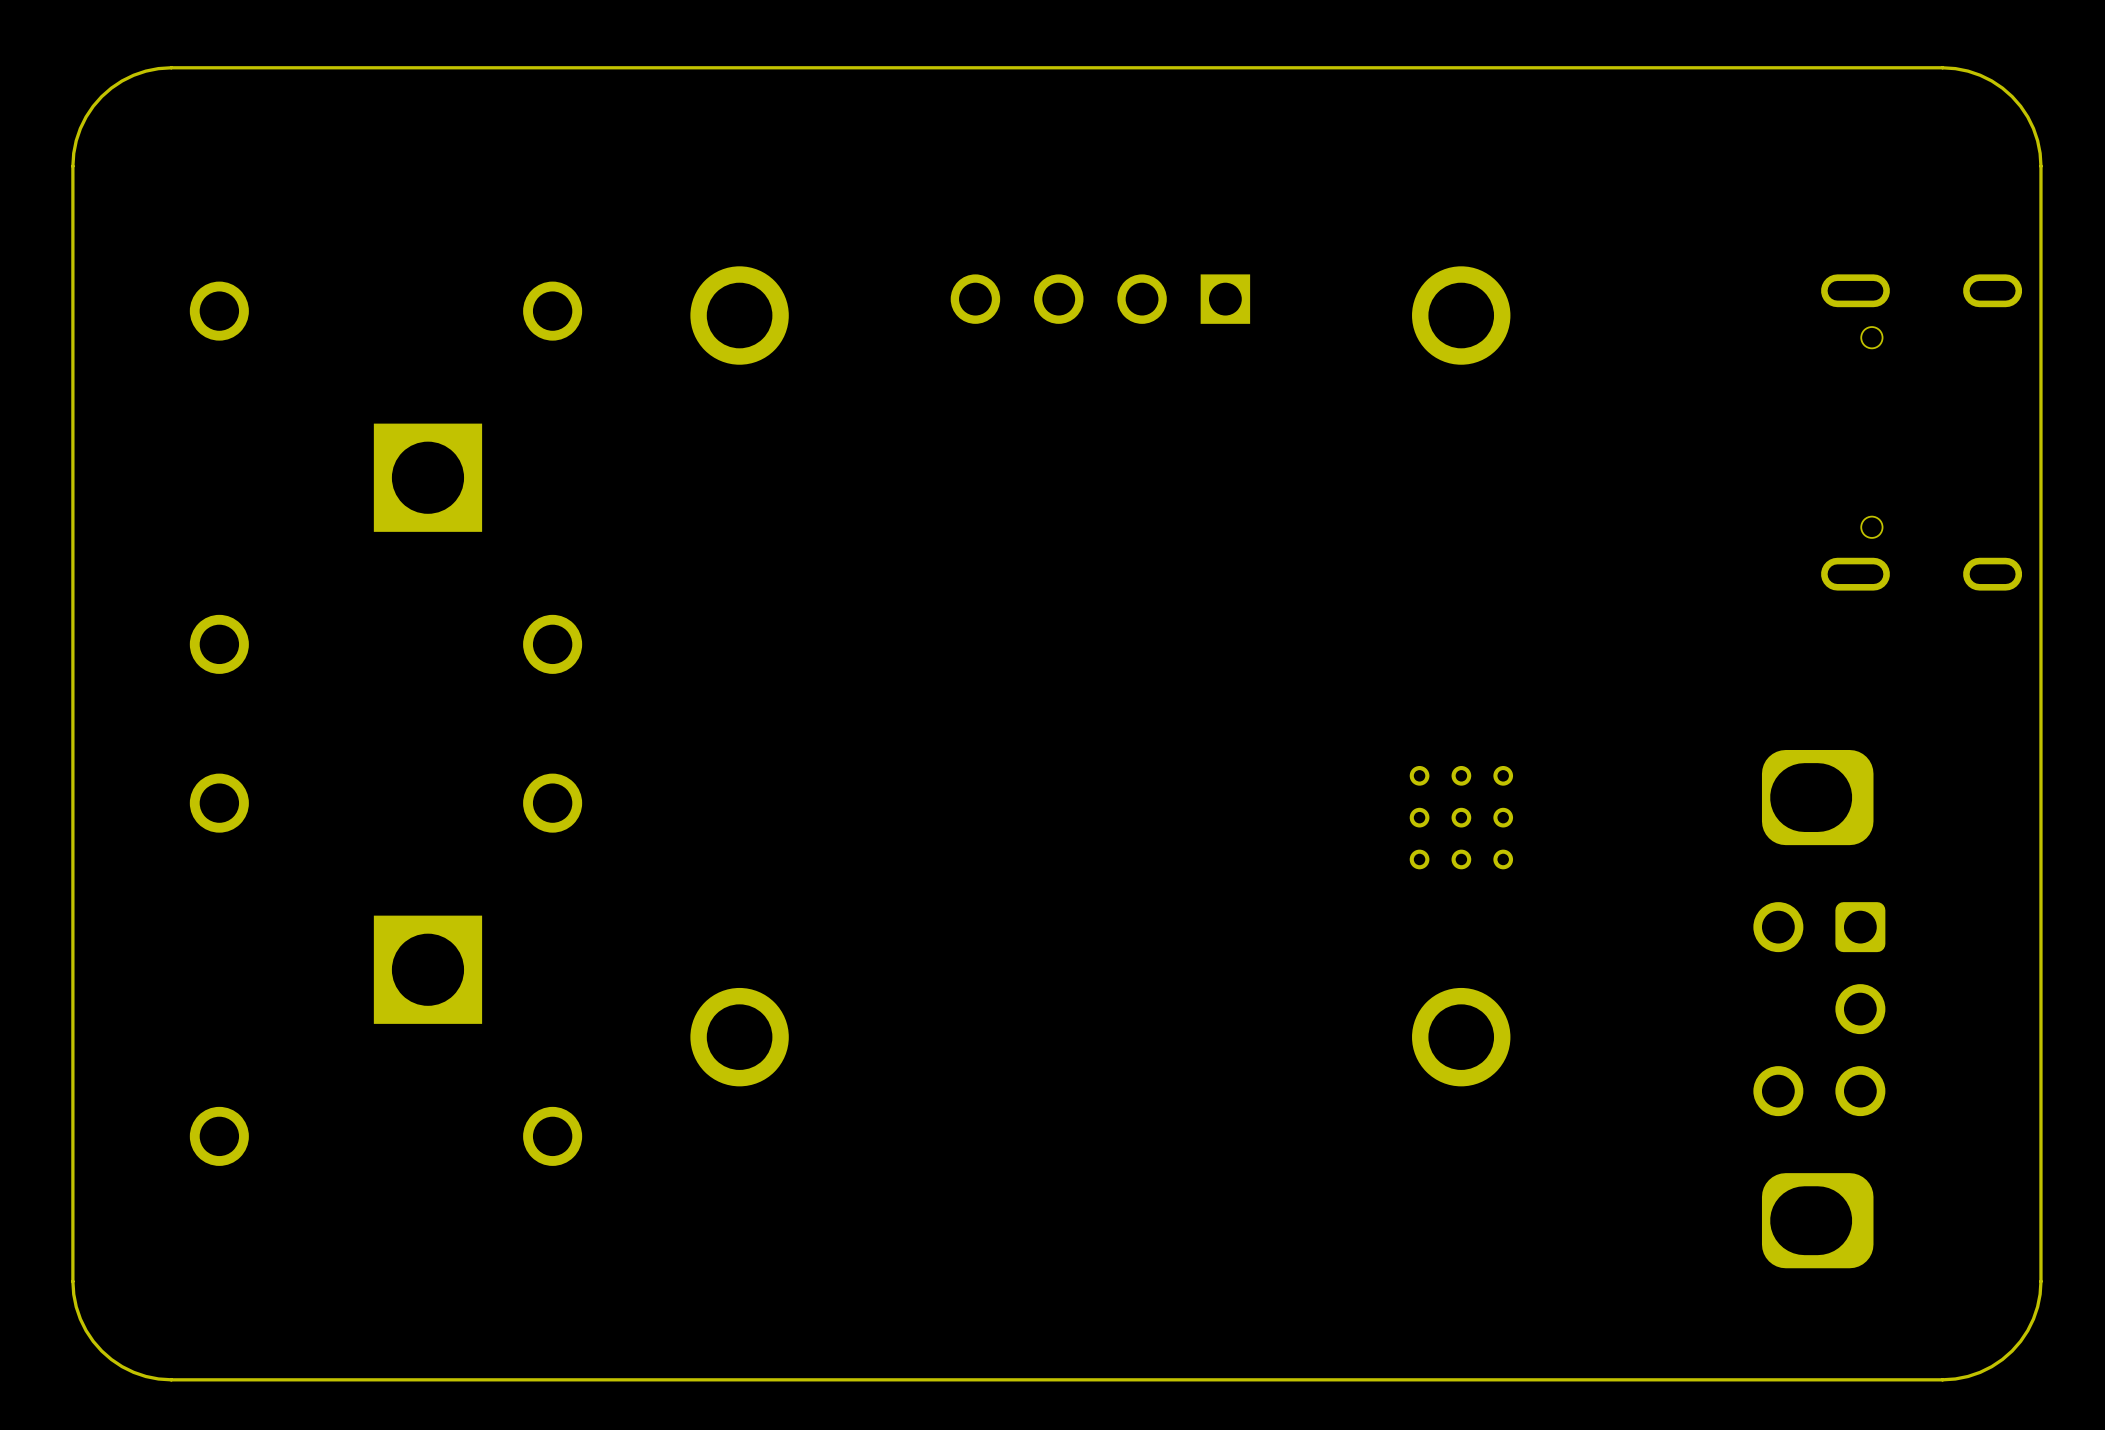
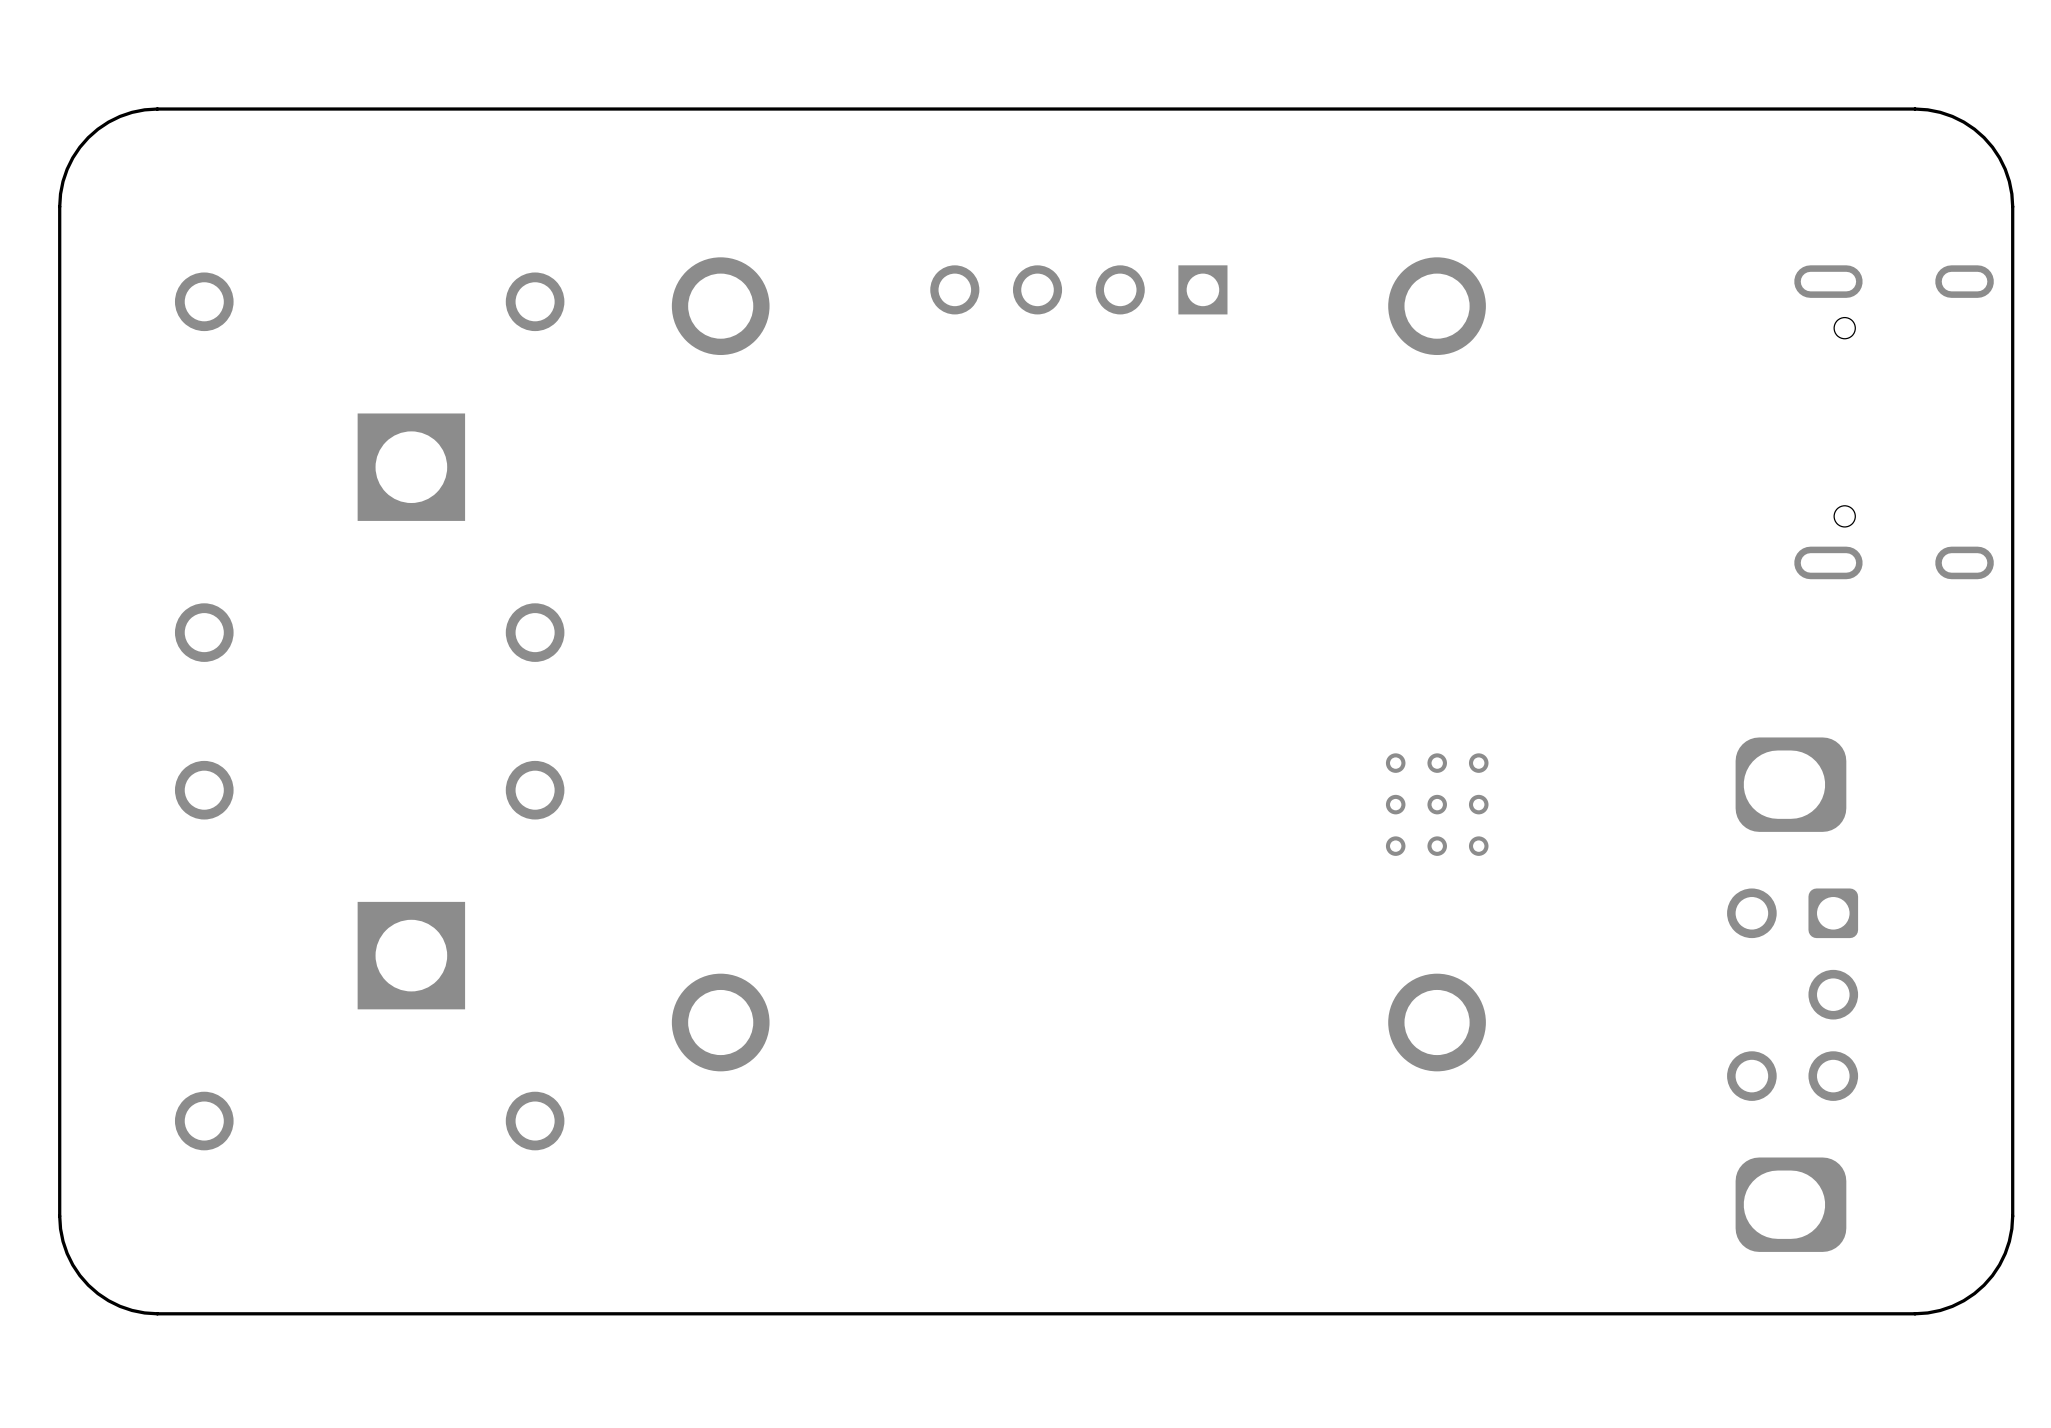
board edge: (1942, 67) (171, 67) (158, 68) (133, 75) (111, 88) (93, 106) (86, 116) (76, 140) (72, 166) (72, 1281) (73, 1294) (80, 1319) (93, 1341) (111, 1359) (133, 1372) (158, 1378) (171, 1379) (1942, 1379) (1968, 1376) (1991, 1366) (2002, 1359) (2012, 1351) (2027, 1330) (2037, 1306) (2040, 1281) (2040, 166) (2040, 153) (2033, 128) (2027, 116) (2012, 96) (1991, 80) (1980, 75) (1955, 68) (1942, 67) -> (1915, 109) (1927, 109) (1952, 116) (1963, 122) (1984, 137) (1992, 147) (2005, 169) (2009, 181) (2012, 206) (2012, 1216) (2009, 1241) (1999, 1264) (1984, 1285) (1963, 1300) (1940, 1310) (1915, 1313) (157, 1313) (132, 1310) (108, 1300) (88, 1285) (72, 1264) (63, 1241) (59, 1216) (59, 206) (63, 181) (72, 157) (88, 137) (108, 122) (132, 112) (157, 109) (1915, 109)

